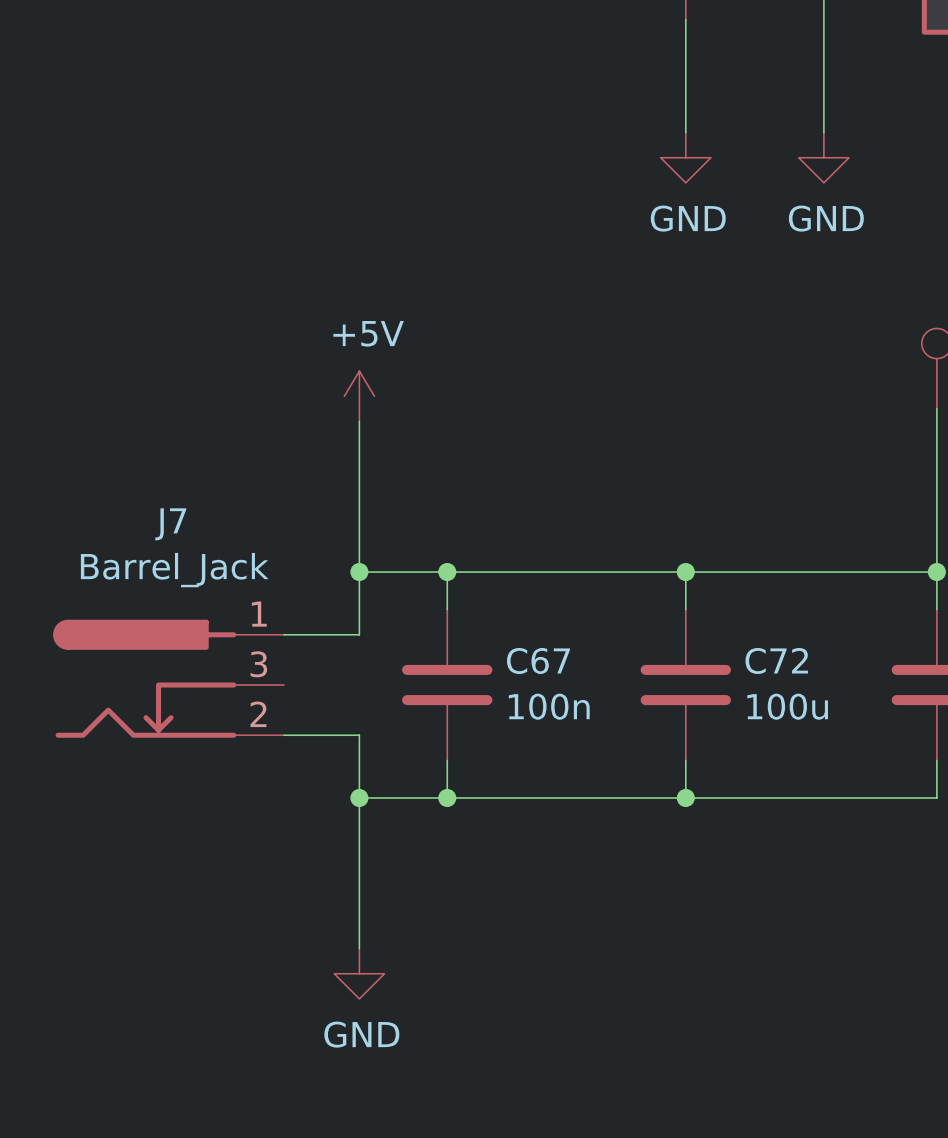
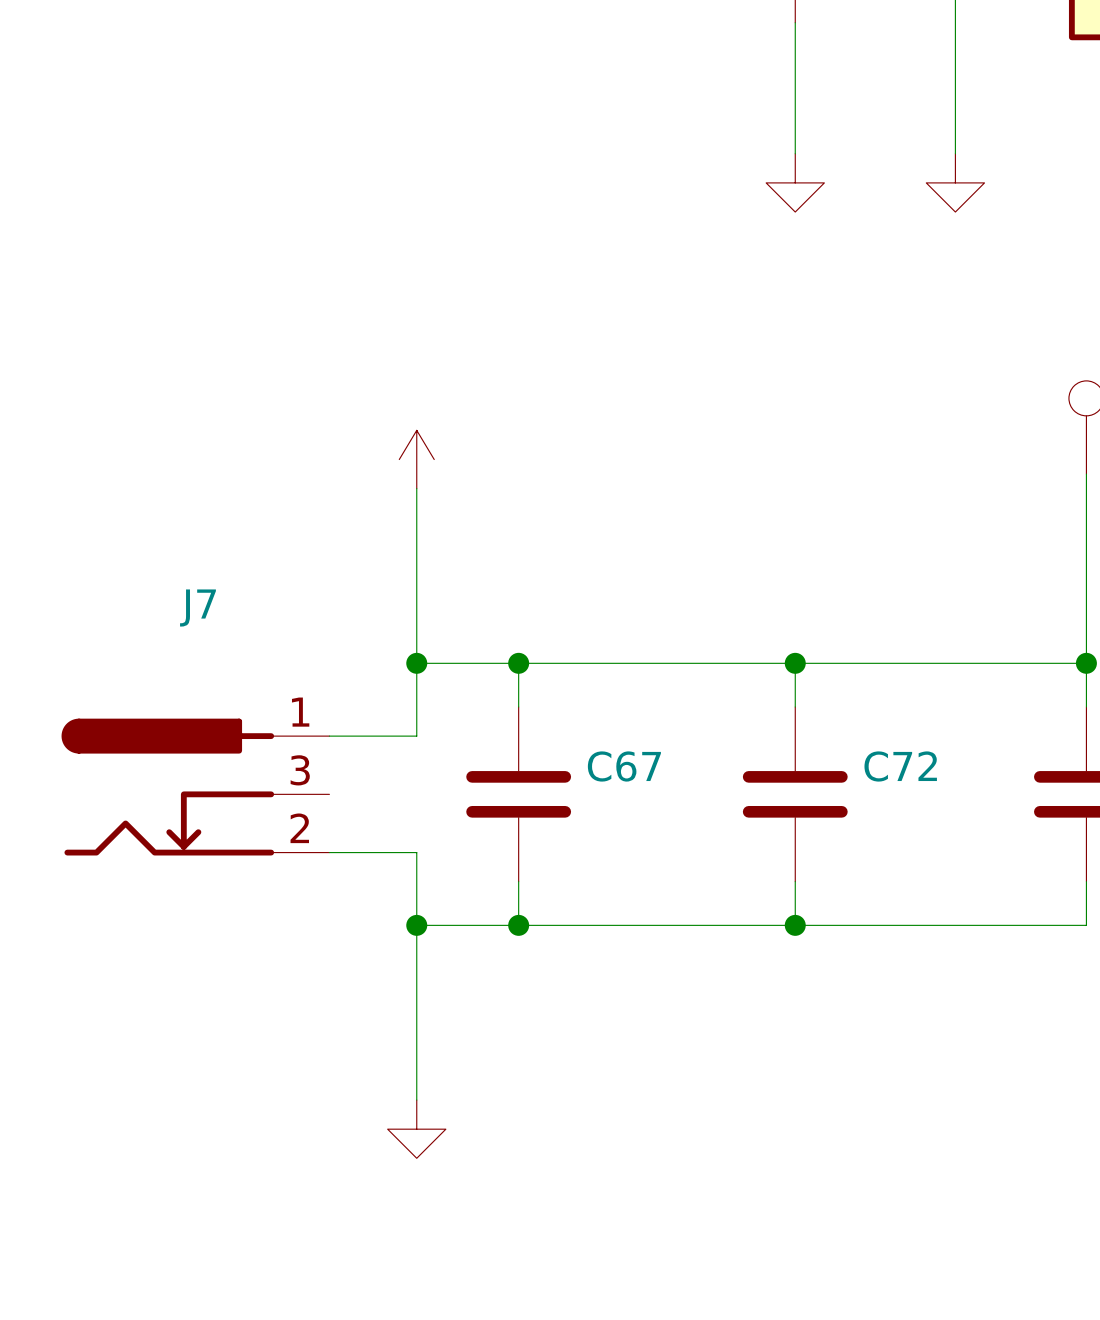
power symbol text: GND (688, 218) -> none
power symbol text: GND (826, 218) -> none
power symbol text: +5V (368, 333) -> none
J7 value: Barrel_Jack (174, 570) -> none
C67 value: 100n (549, 706) -> none
C72 value: 100u (787, 706) -> none
power symbol text: GND (361, 1034) -> none

